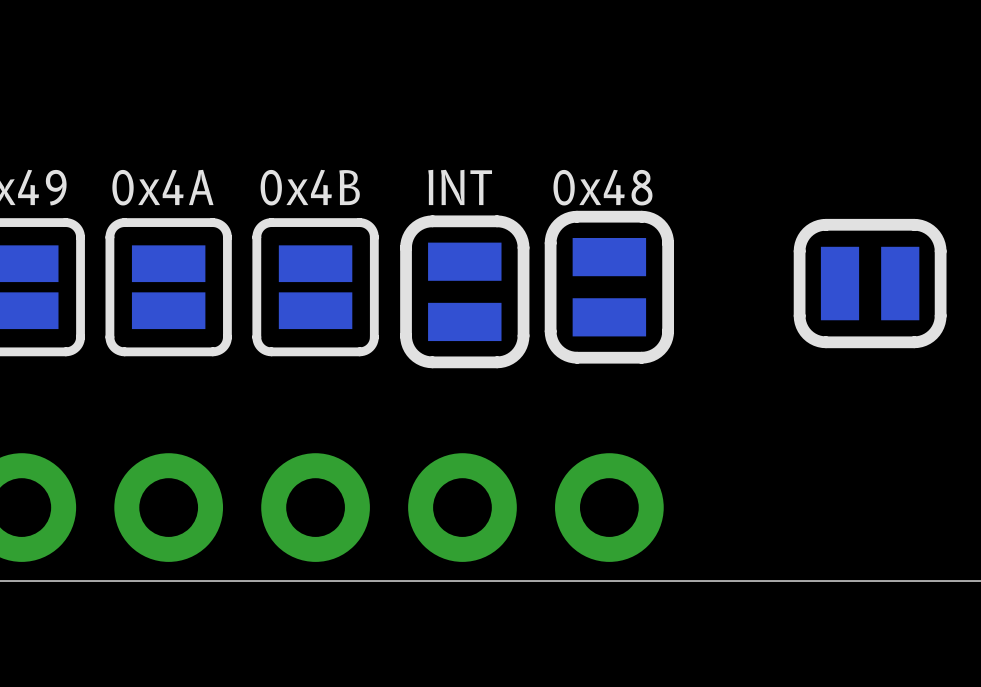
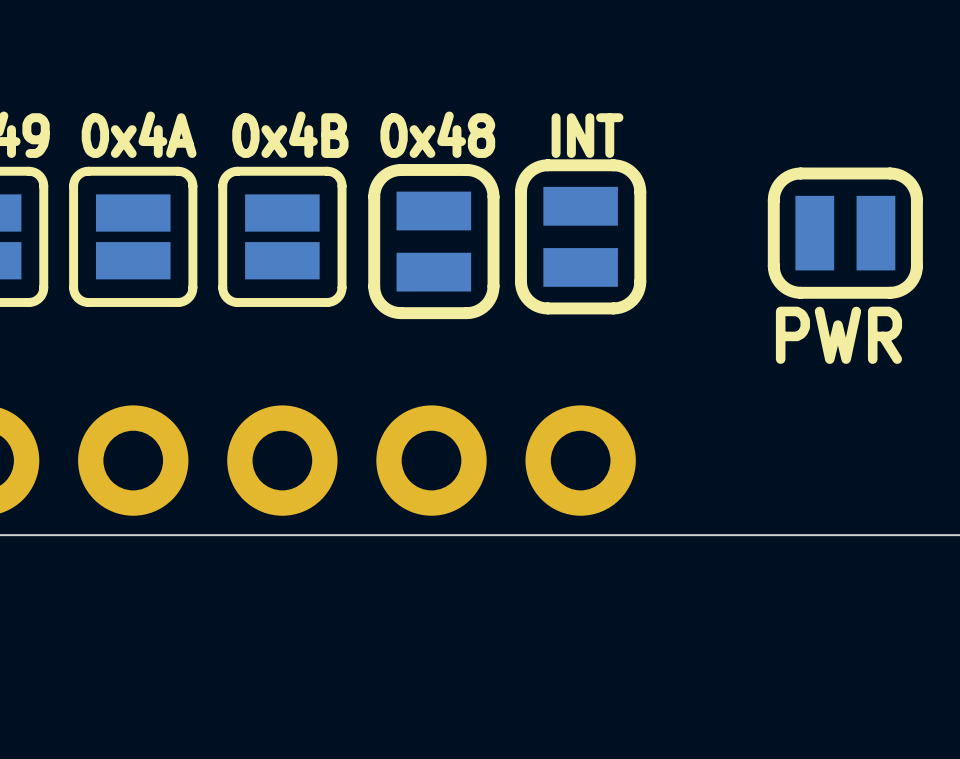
text: INT (460, 187) -> 0x48 (437, 134)
text: 0x48 (602, 187) -> INT (587, 135)
text: none -> PWR (838, 335)

